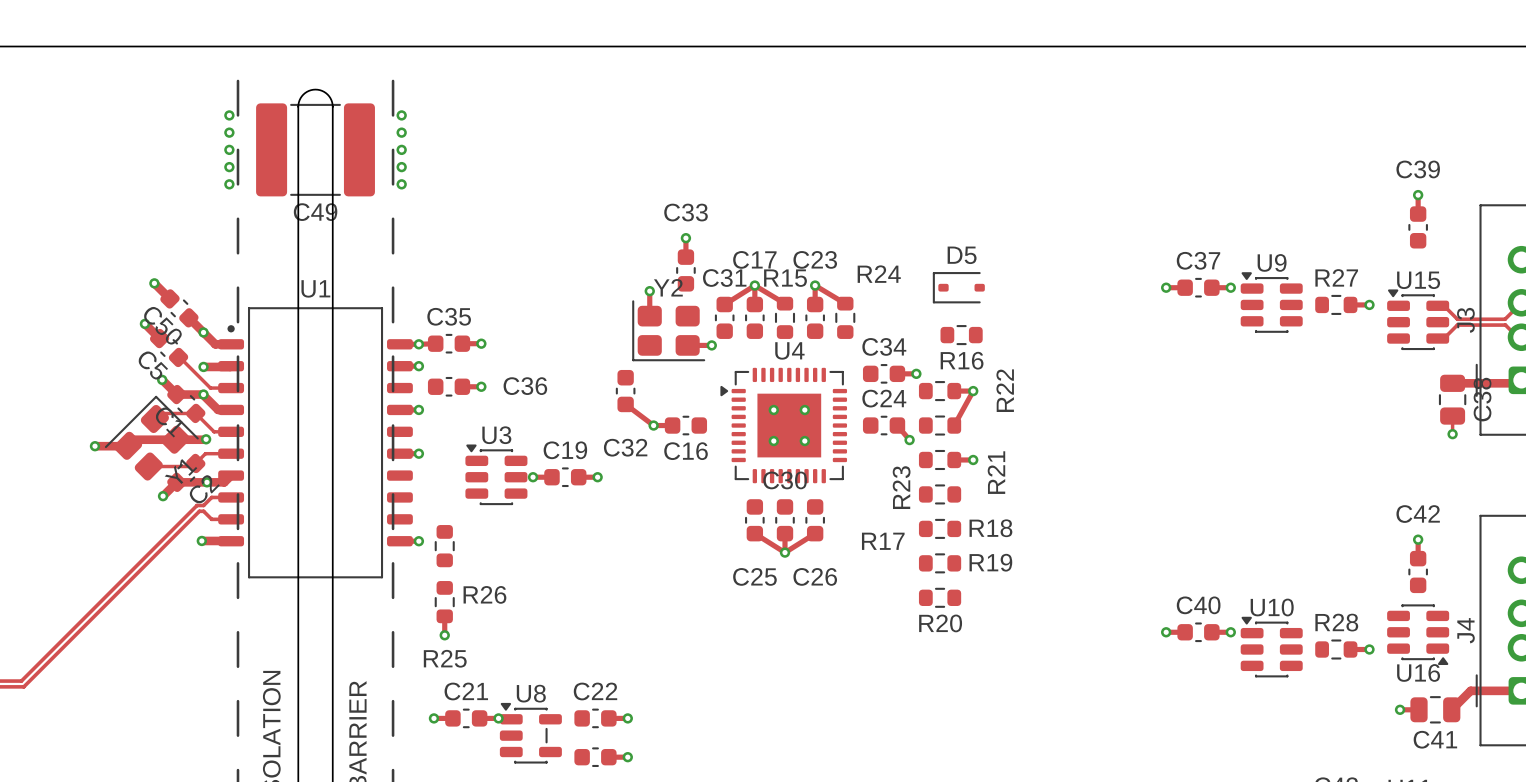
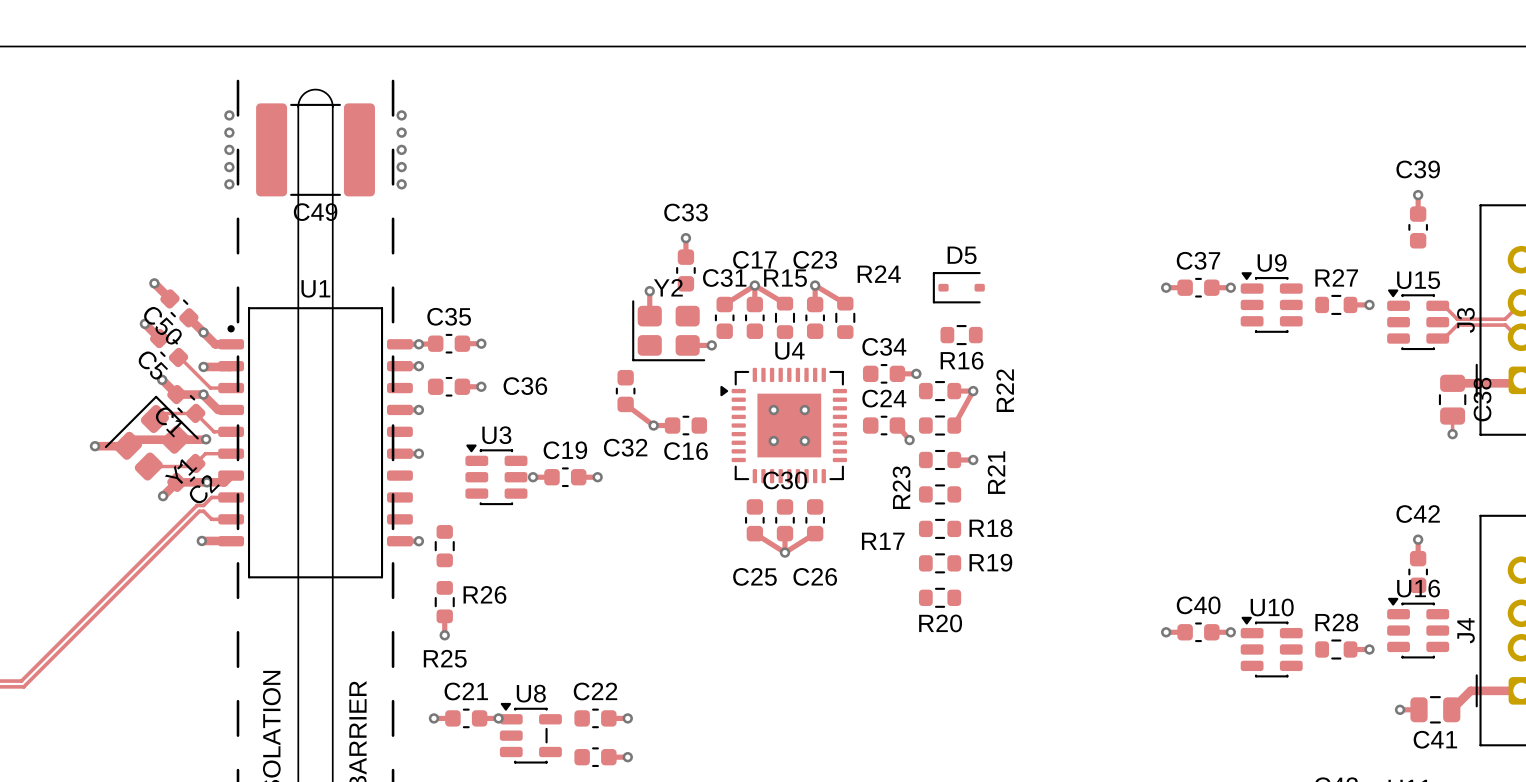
U16 rotation: 0° (1418, 634) -> 180° (1418, 628)

